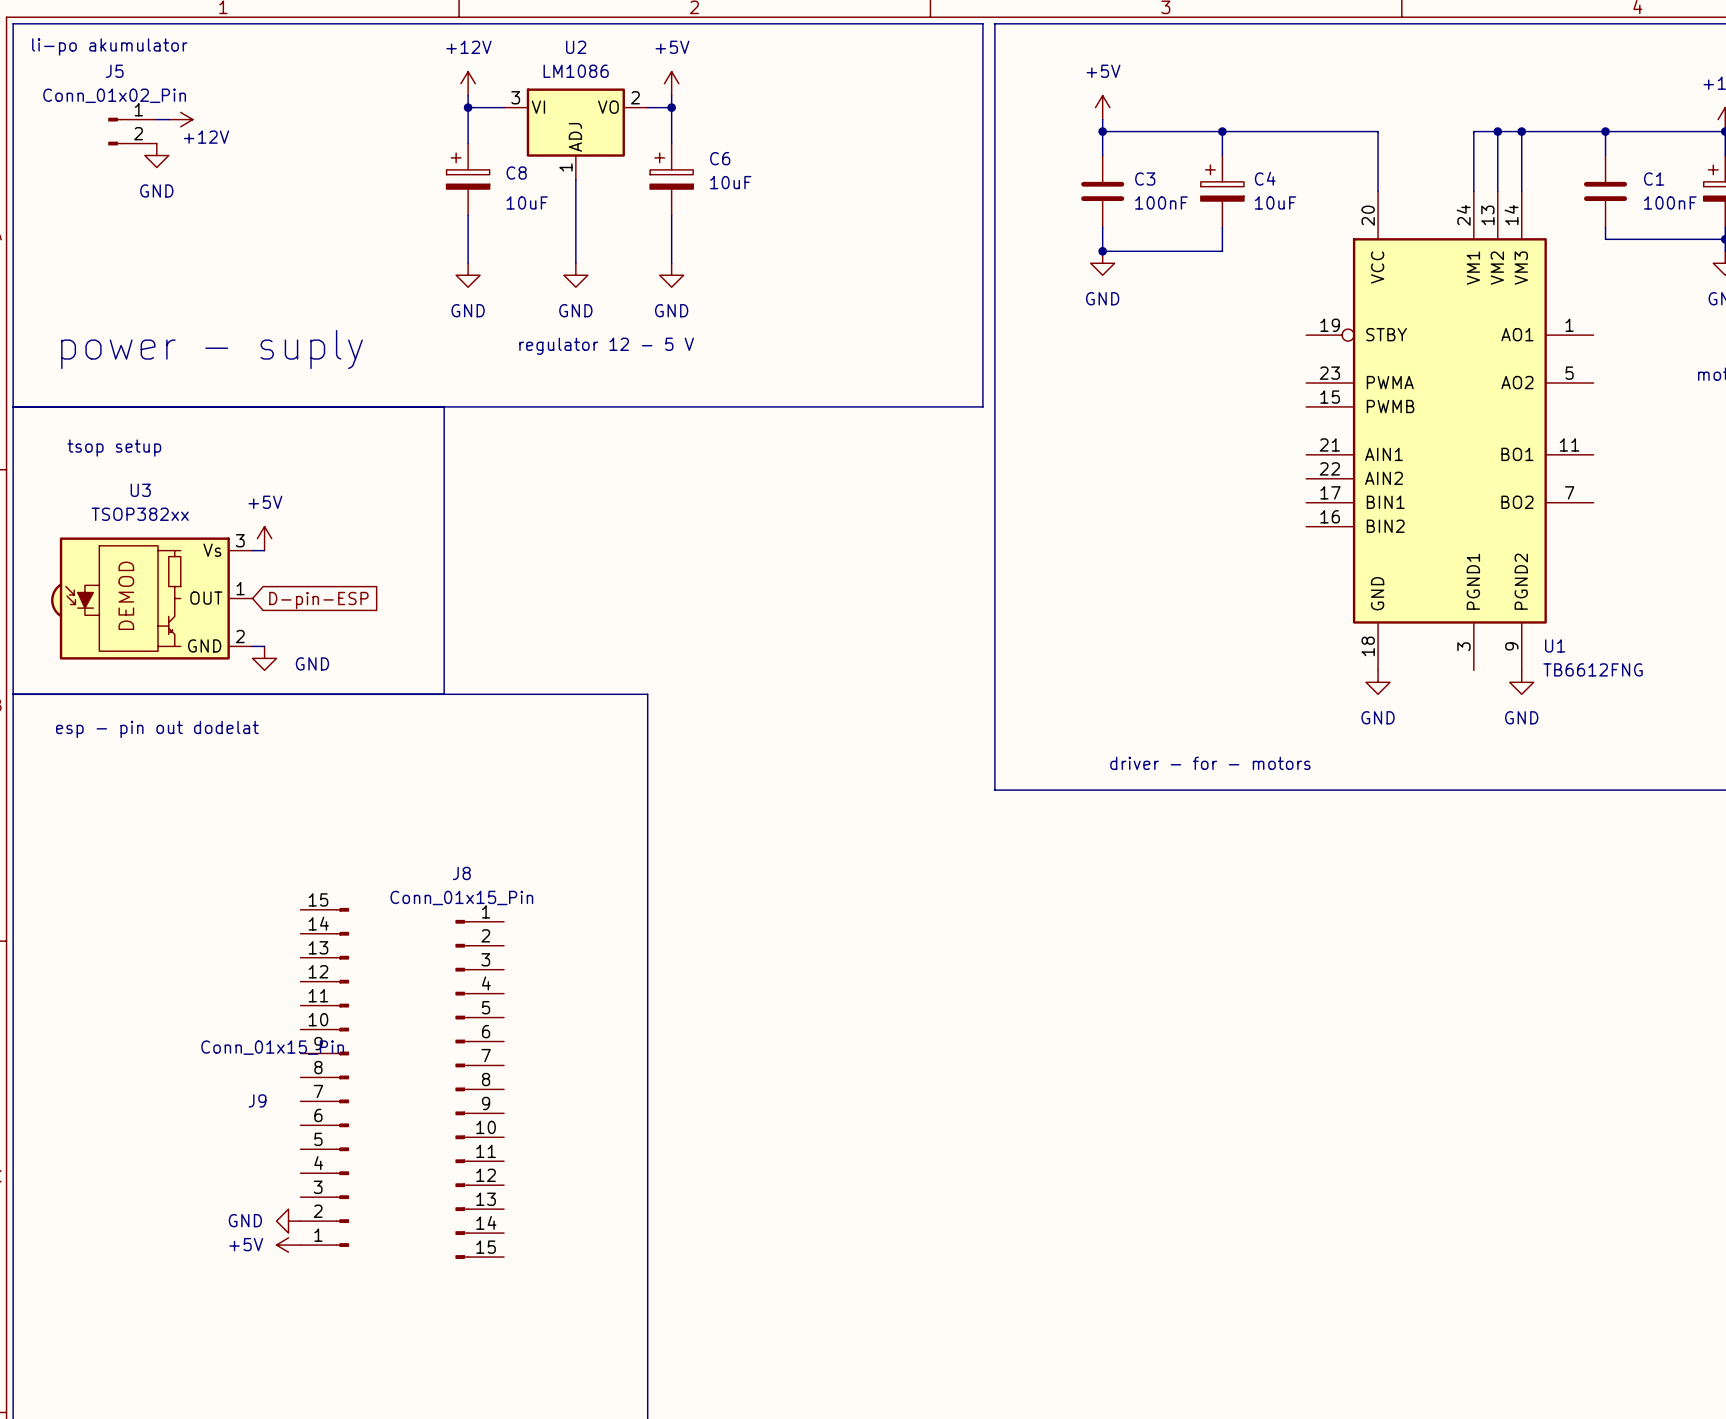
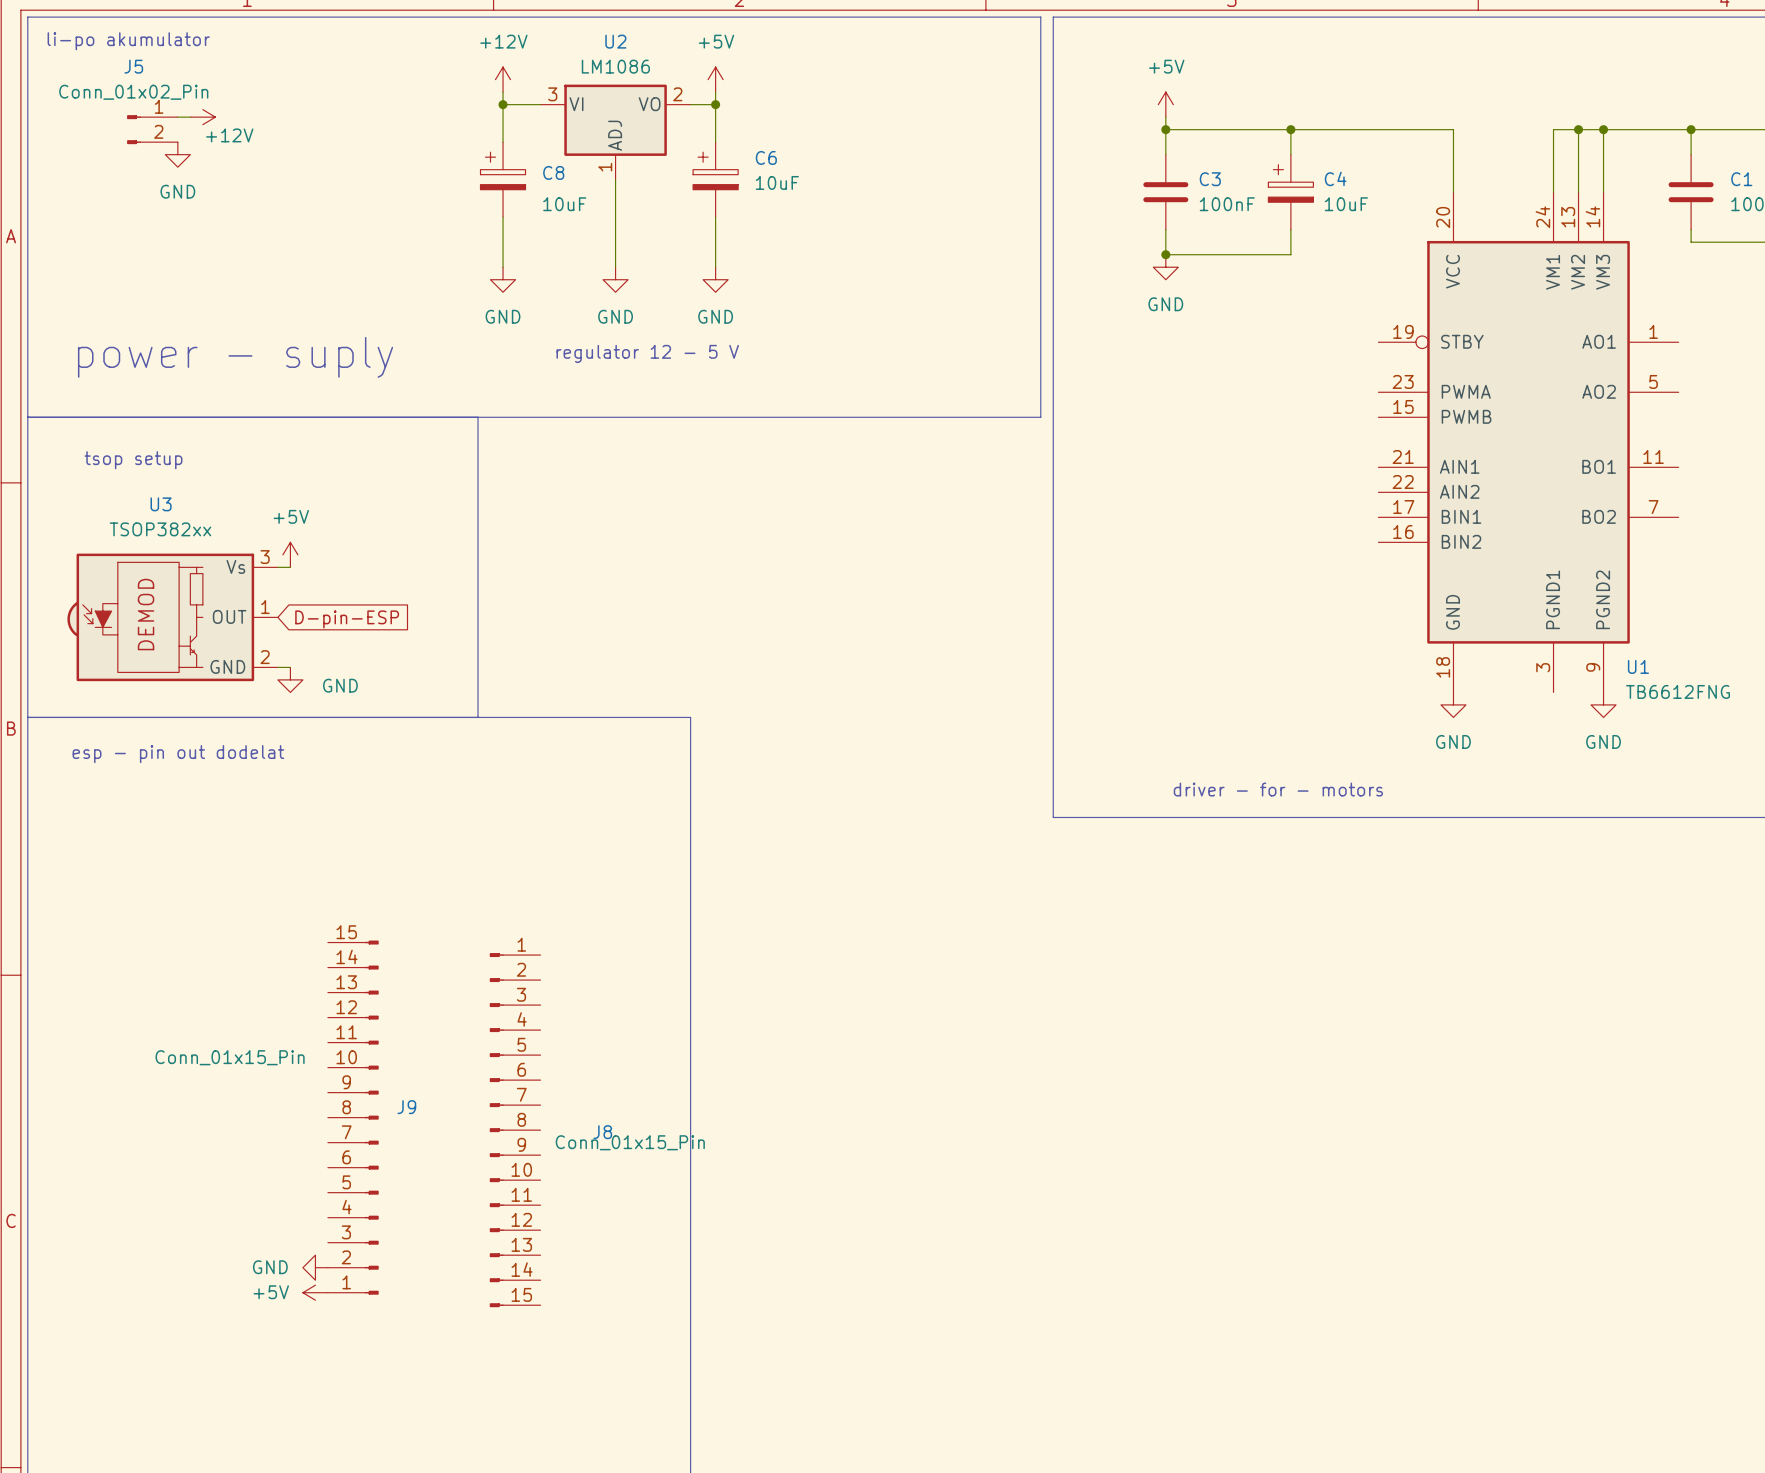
J8 name position: J8 (461, 873) -> J8 (602, 1132)
J8 value position: Conn_01x15_Pin (461, 897) -> Conn_01x15_Pin (630, 1142)
J9 value position: Conn_01x15_Pin (272, 1047) -> Conn_01x15_Pin (230, 1057)
J9 name position: J9 (257, 1100) -> J9 (406, 1107)

